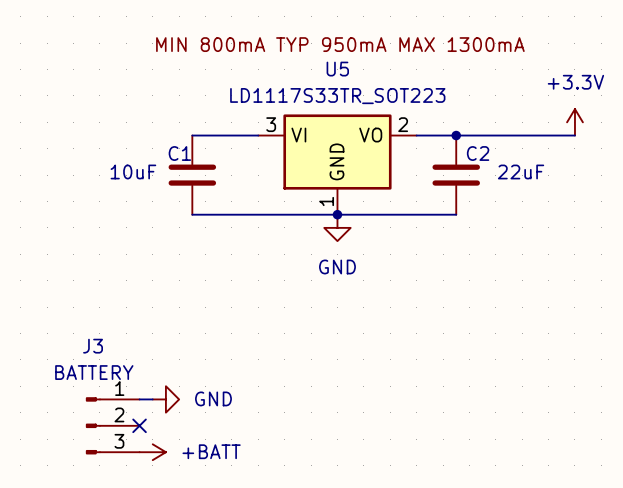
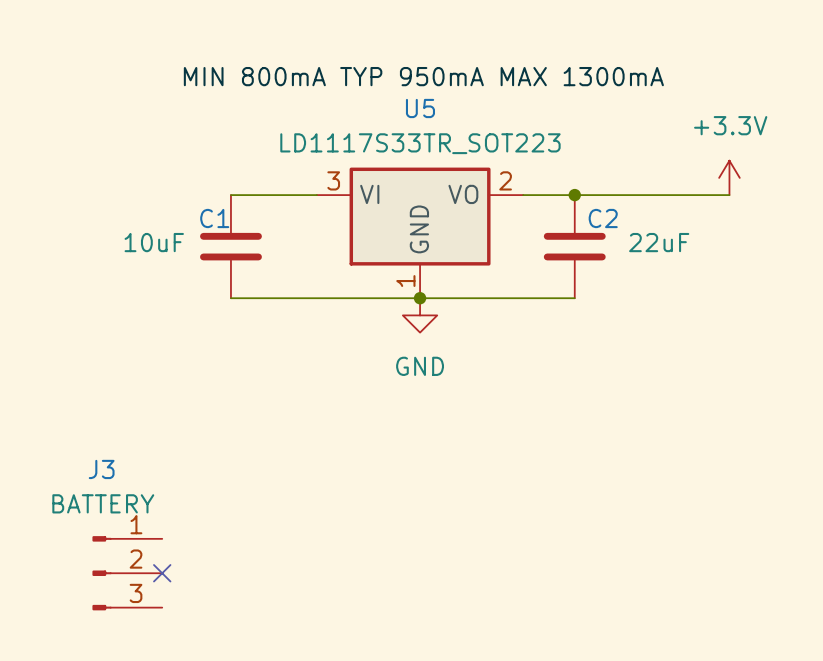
wire: (139, 399) (152, 399) -> none
power symbol: GND (165, 399) -> none
power symbol: +BATT (152, 452) -> none

